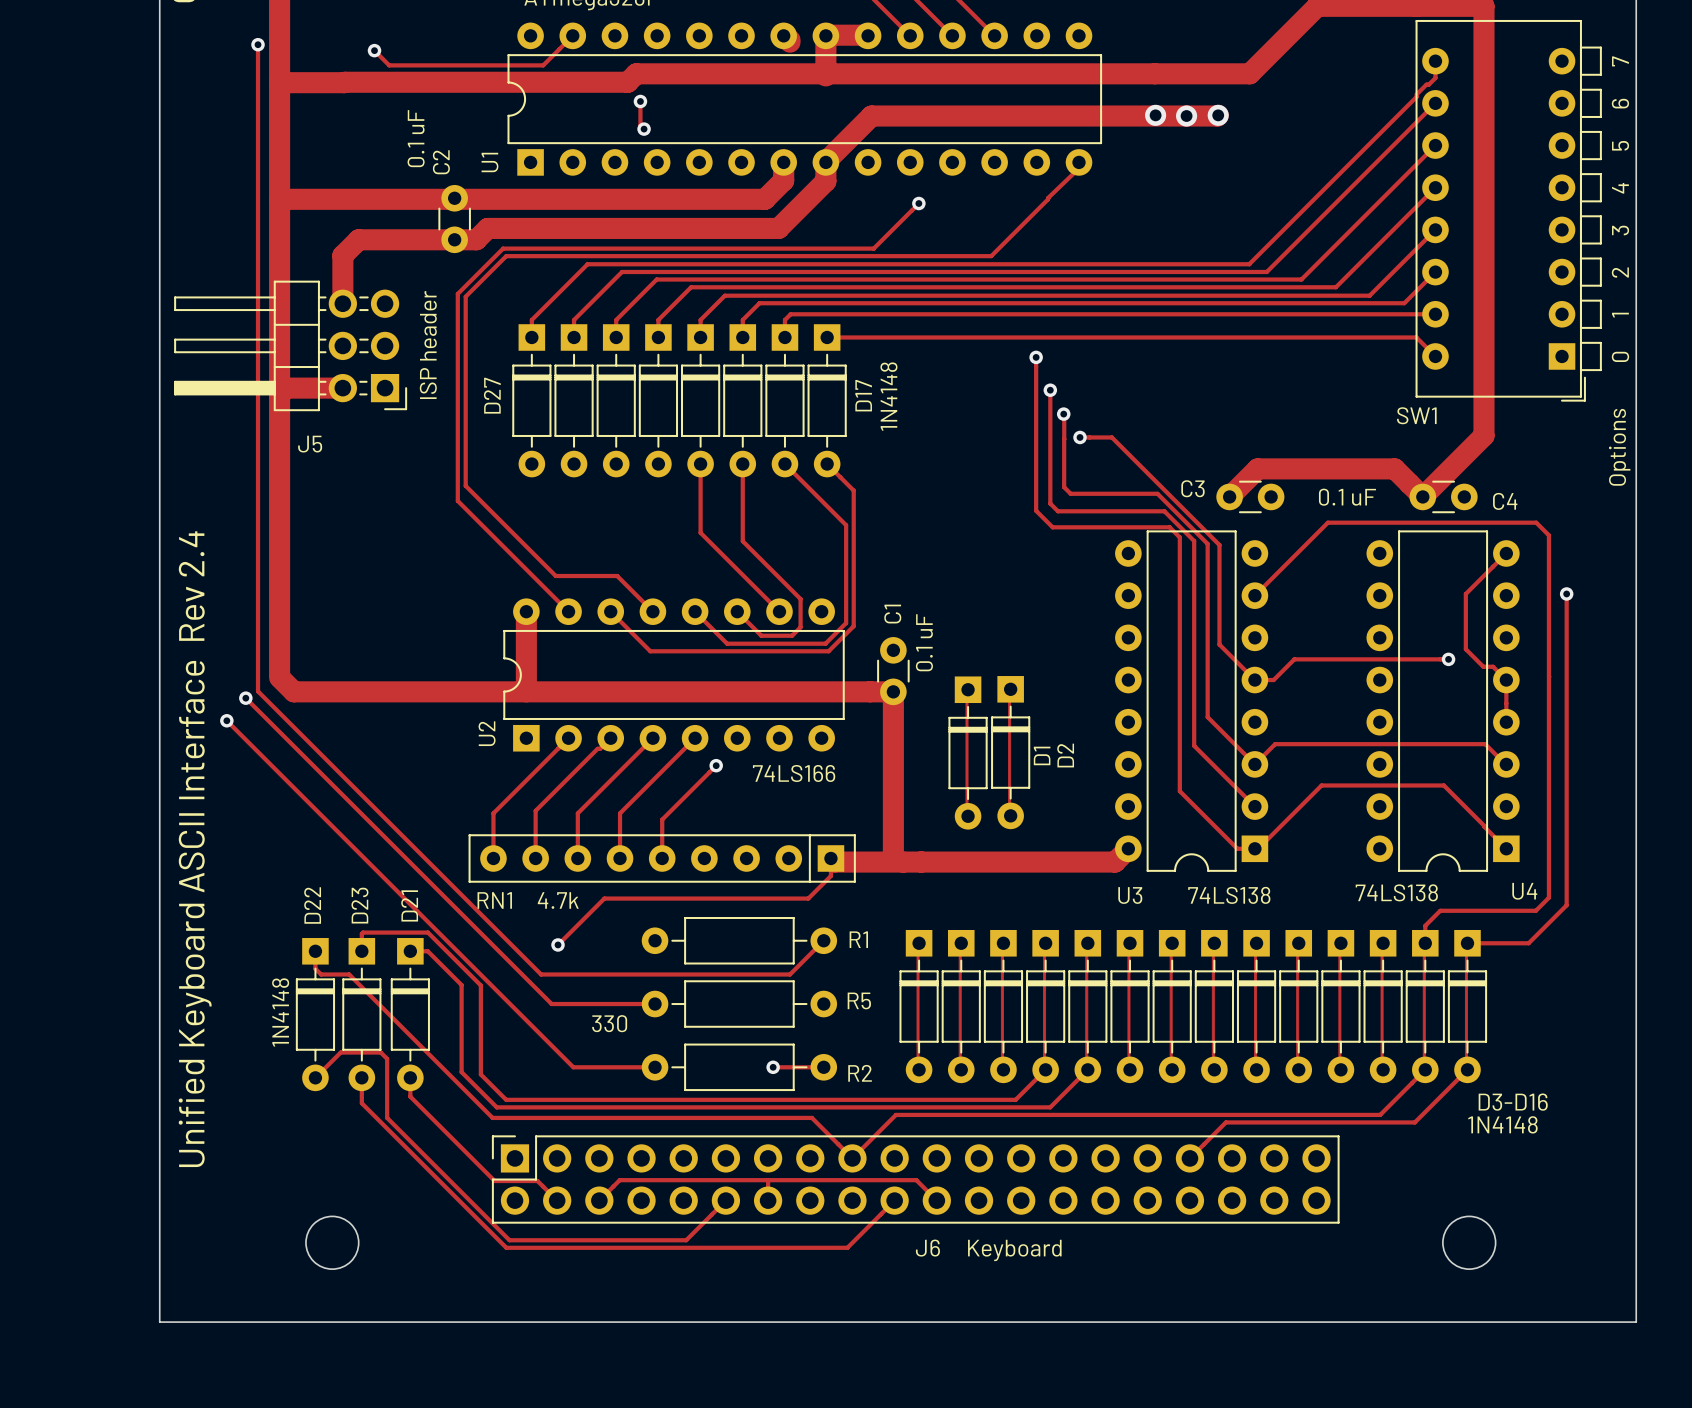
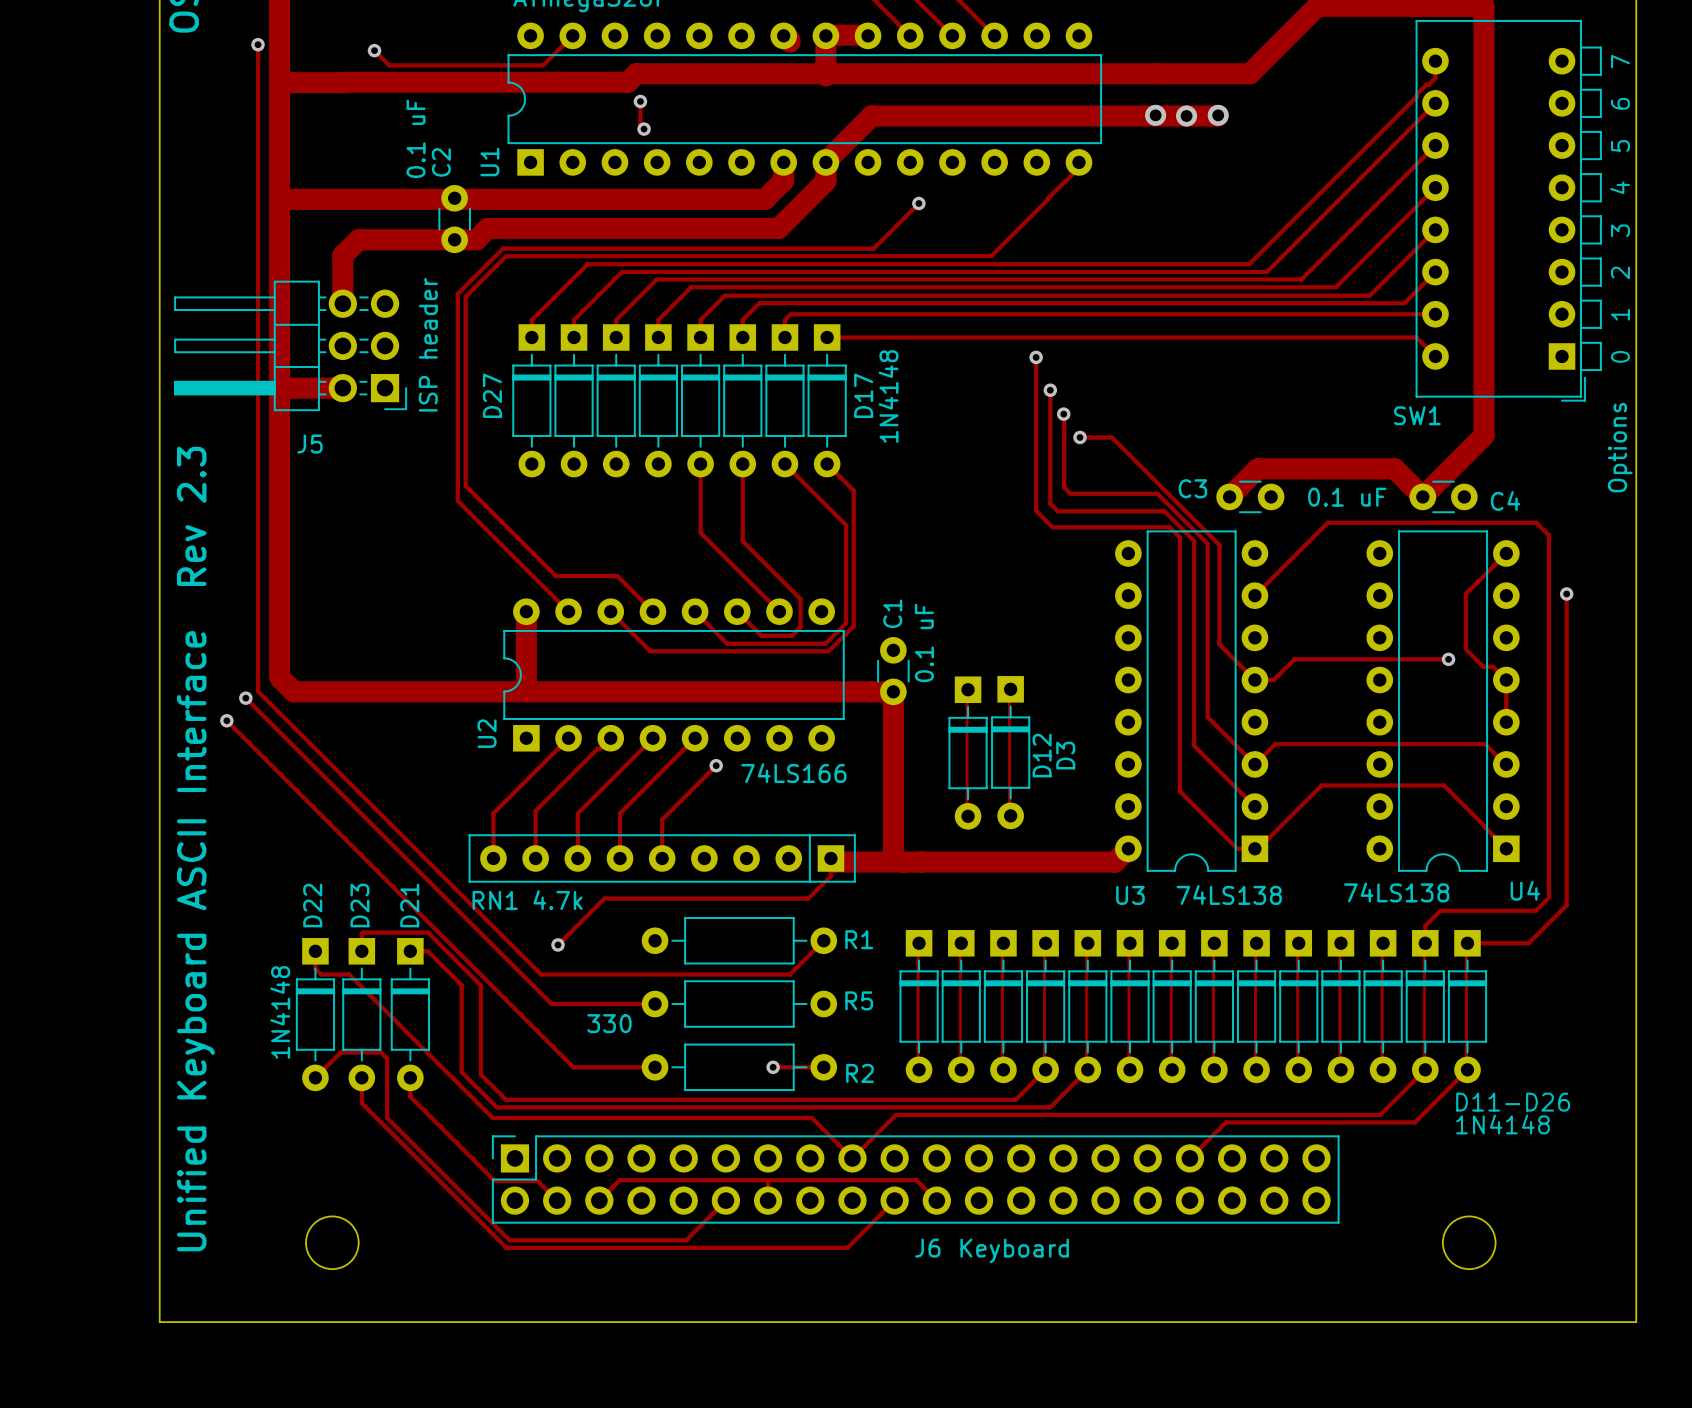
D1 name: D1 (1042, 755) -> D12 (1042, 755)
D2 name: D2 (1065, 755) -> D3 (1065, 755)
text: Unified Keyboard ASCII Interface Rev 2.4 (195, 849) -> Unified Keyboard ASCII Interface Rev 2.3 (195, 849)
text: D3-D16 (1513, 1102) -> D11-D26 (1513, 1102)

